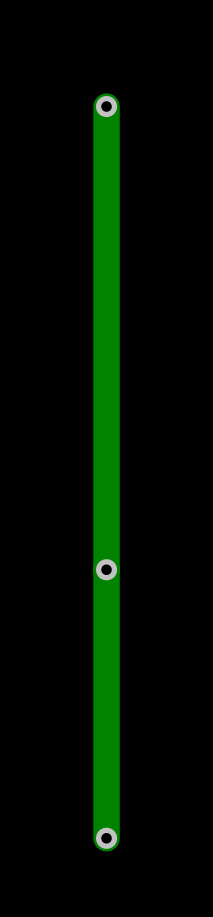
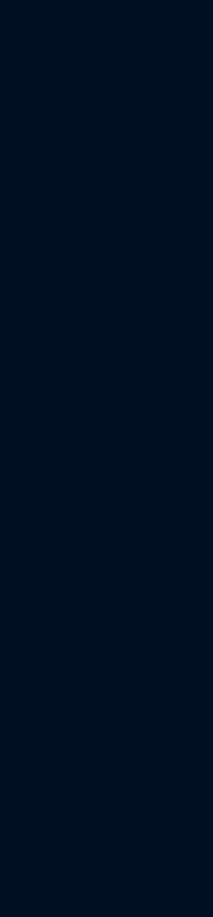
track: (106, 106) (106, 838) -> none
via: (106, 106) -> none
via: (106, 569) -> none
via: (106, 838) -> none

